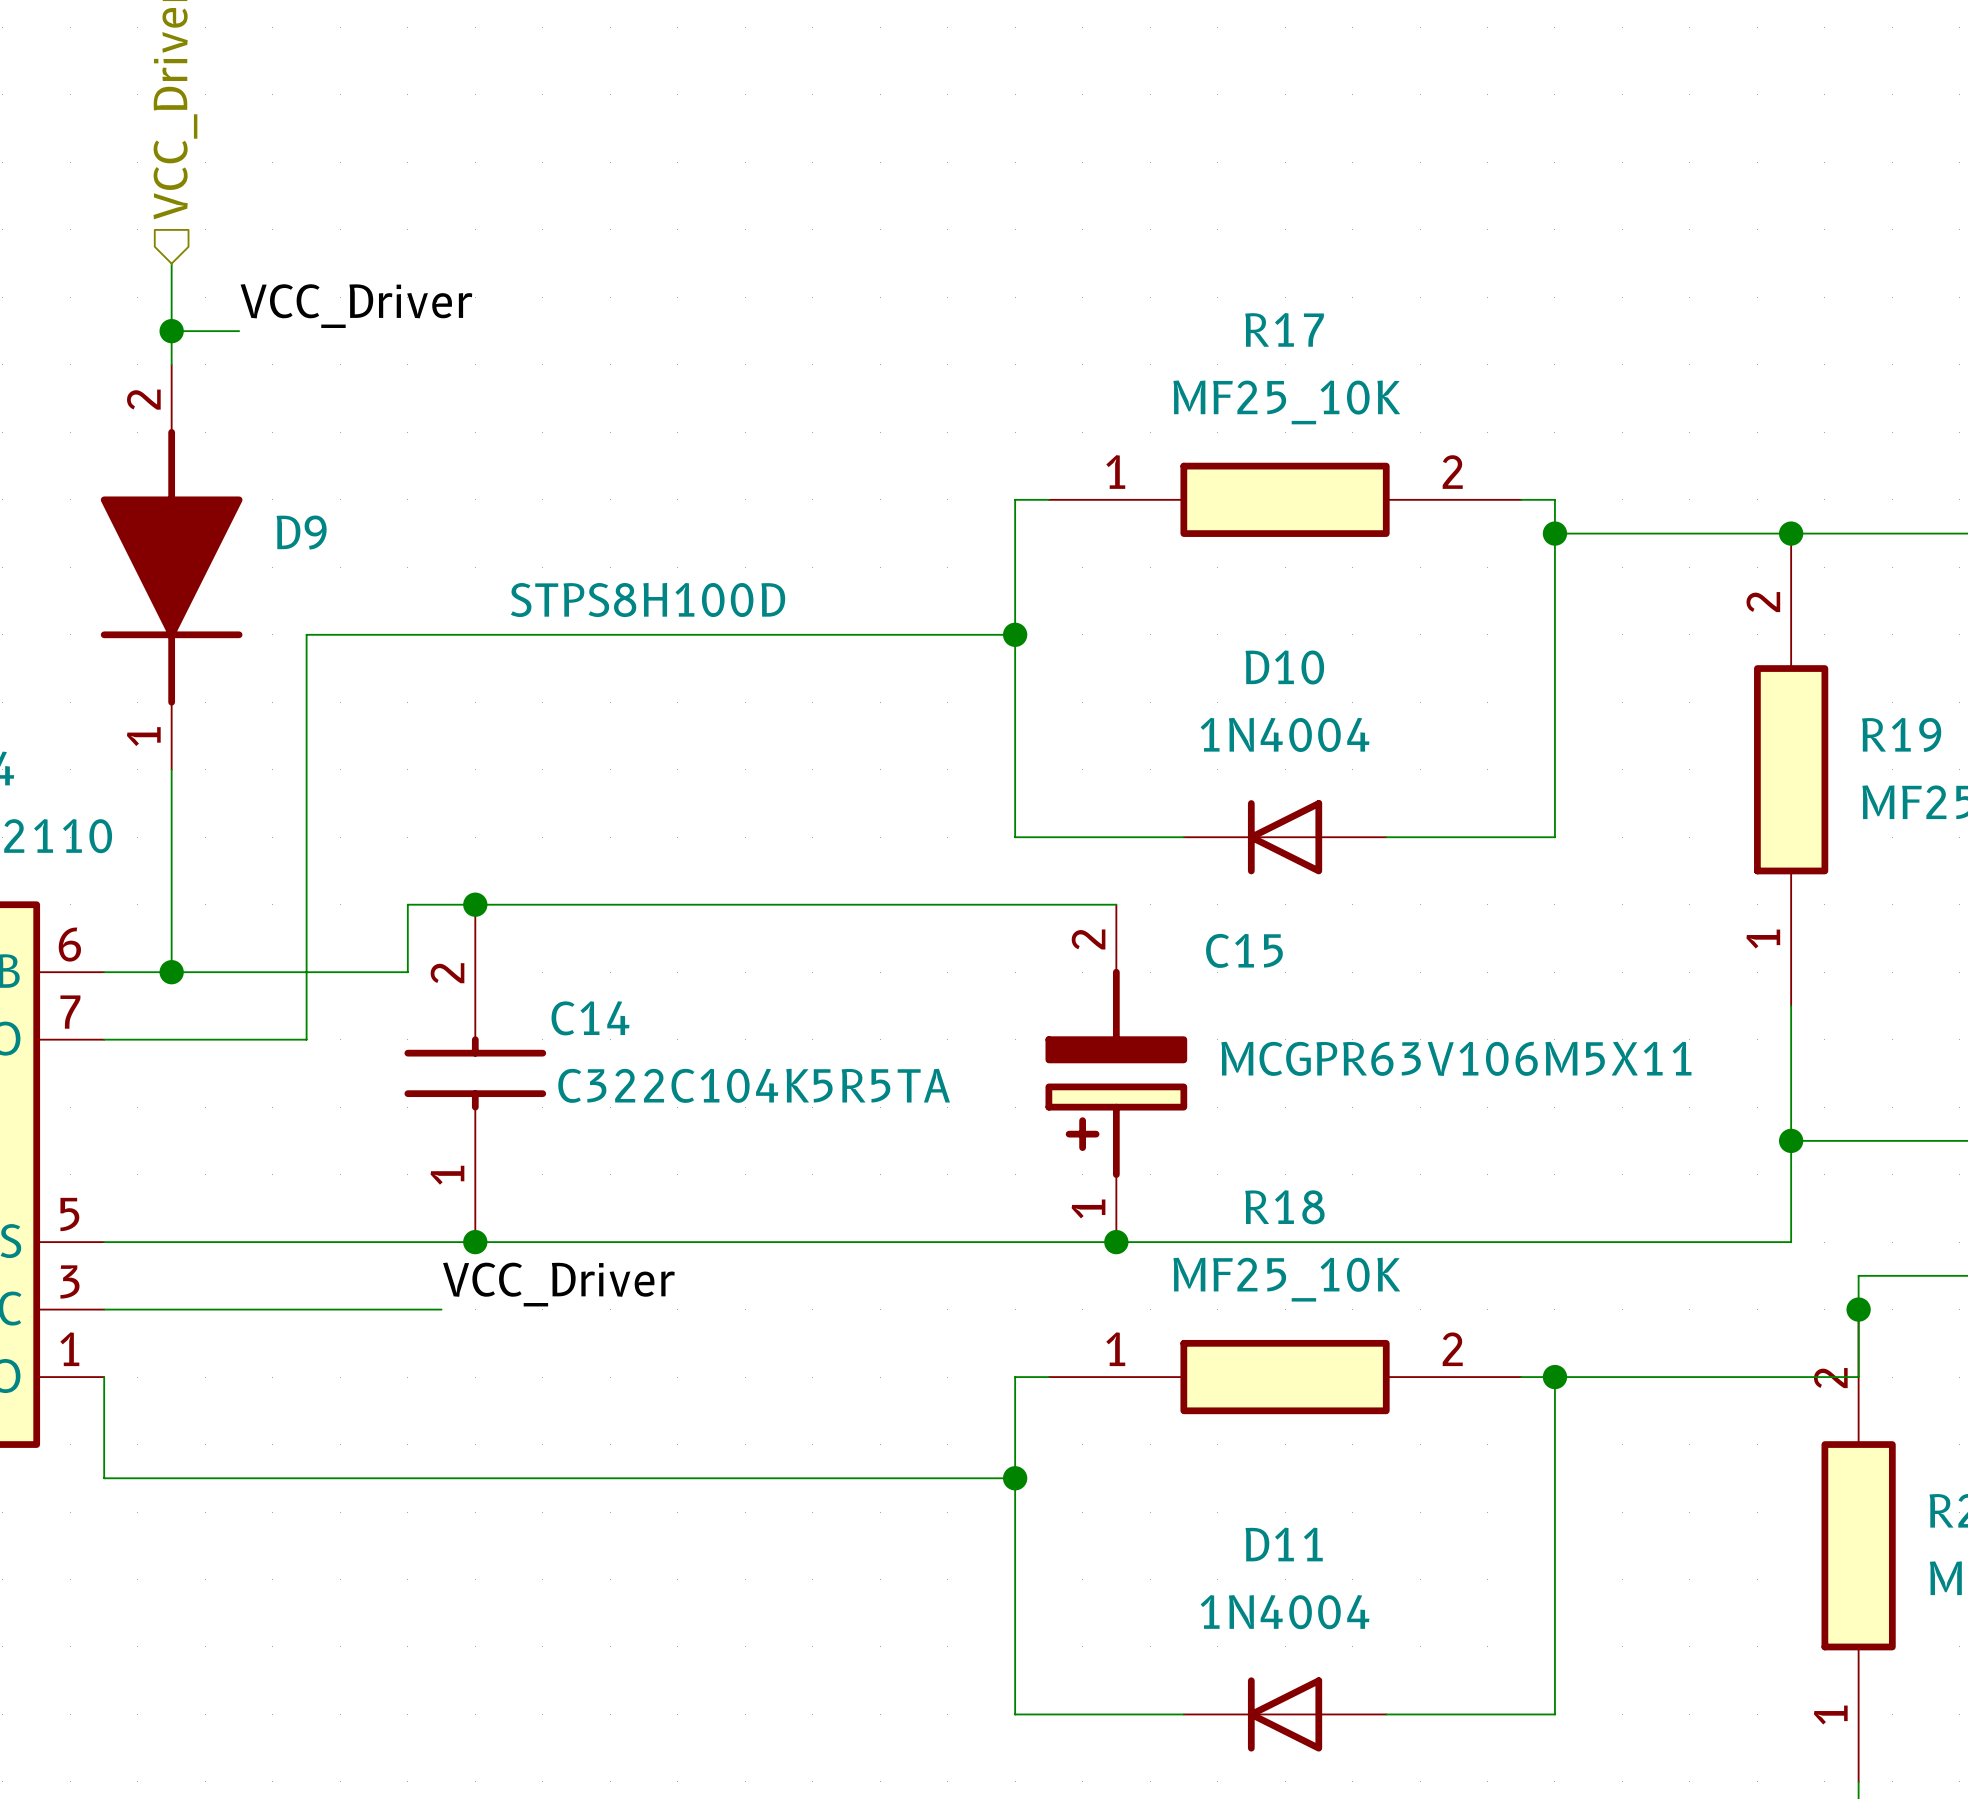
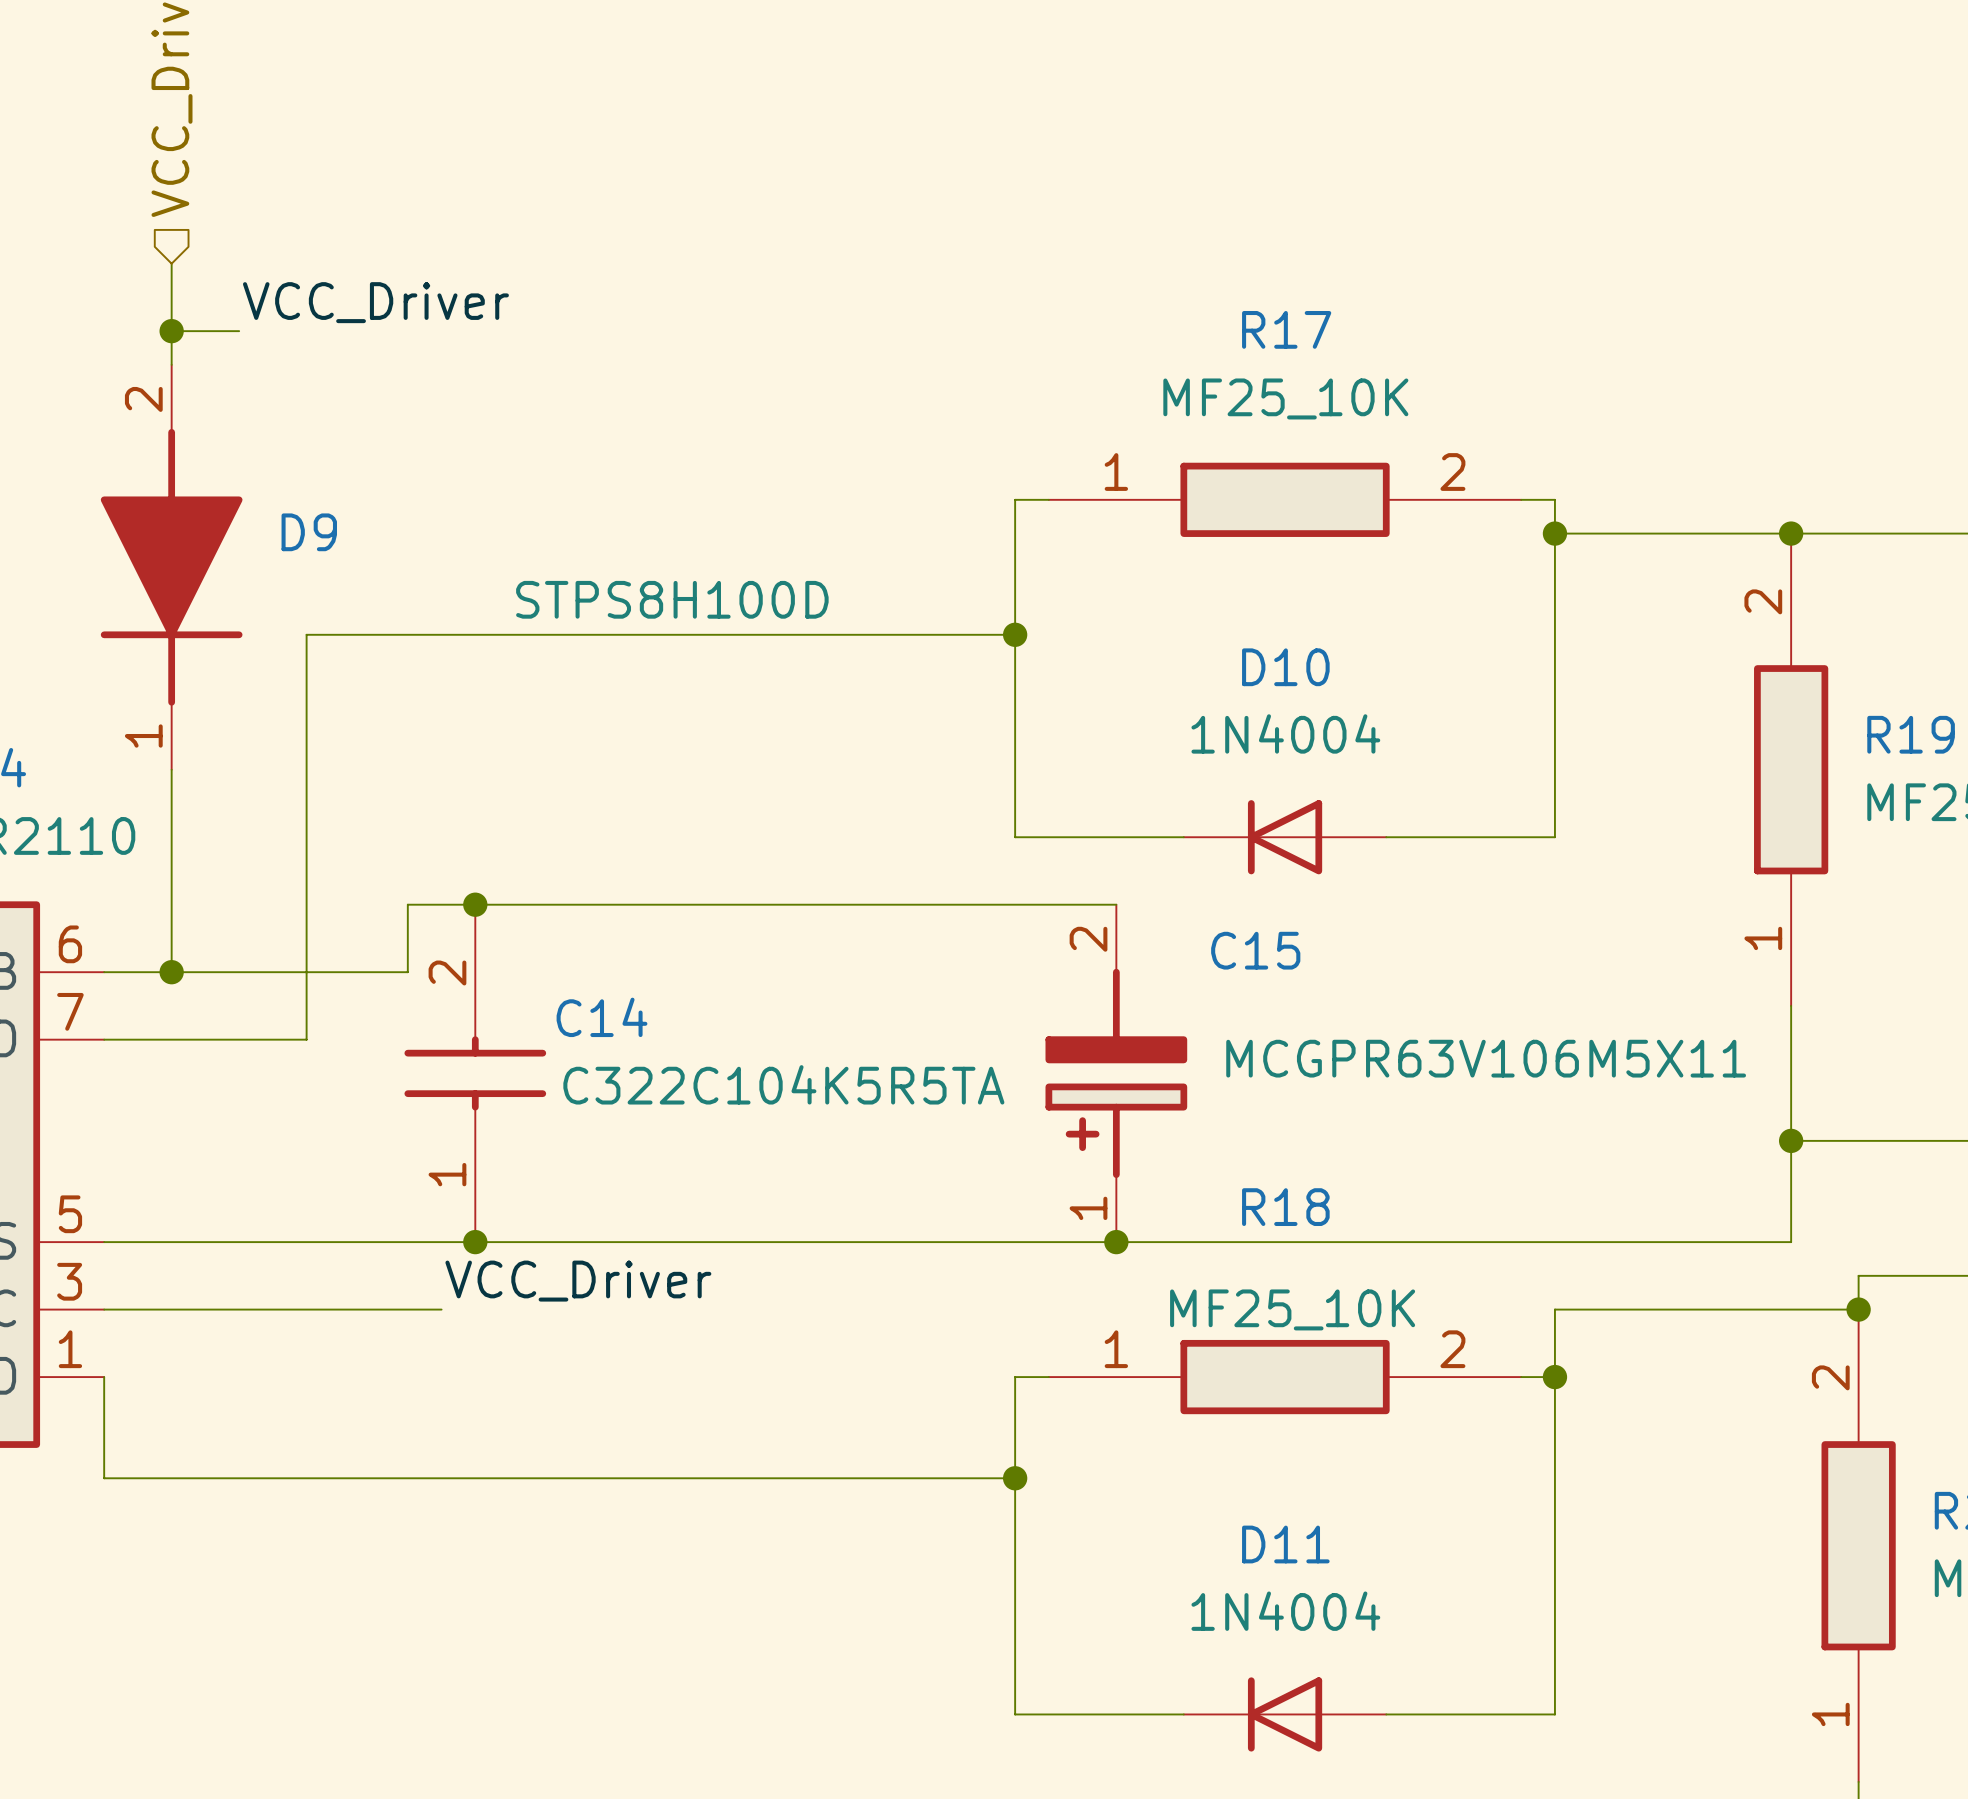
R18 value position: MF25_10K (1286, 1279) -> MF25_10K (1292, 1309)
wire: (1858, 1309) (1858, 1377) (1554, 1377) -> (1858, 1309) (1554, 1309) (1554, 1377)

